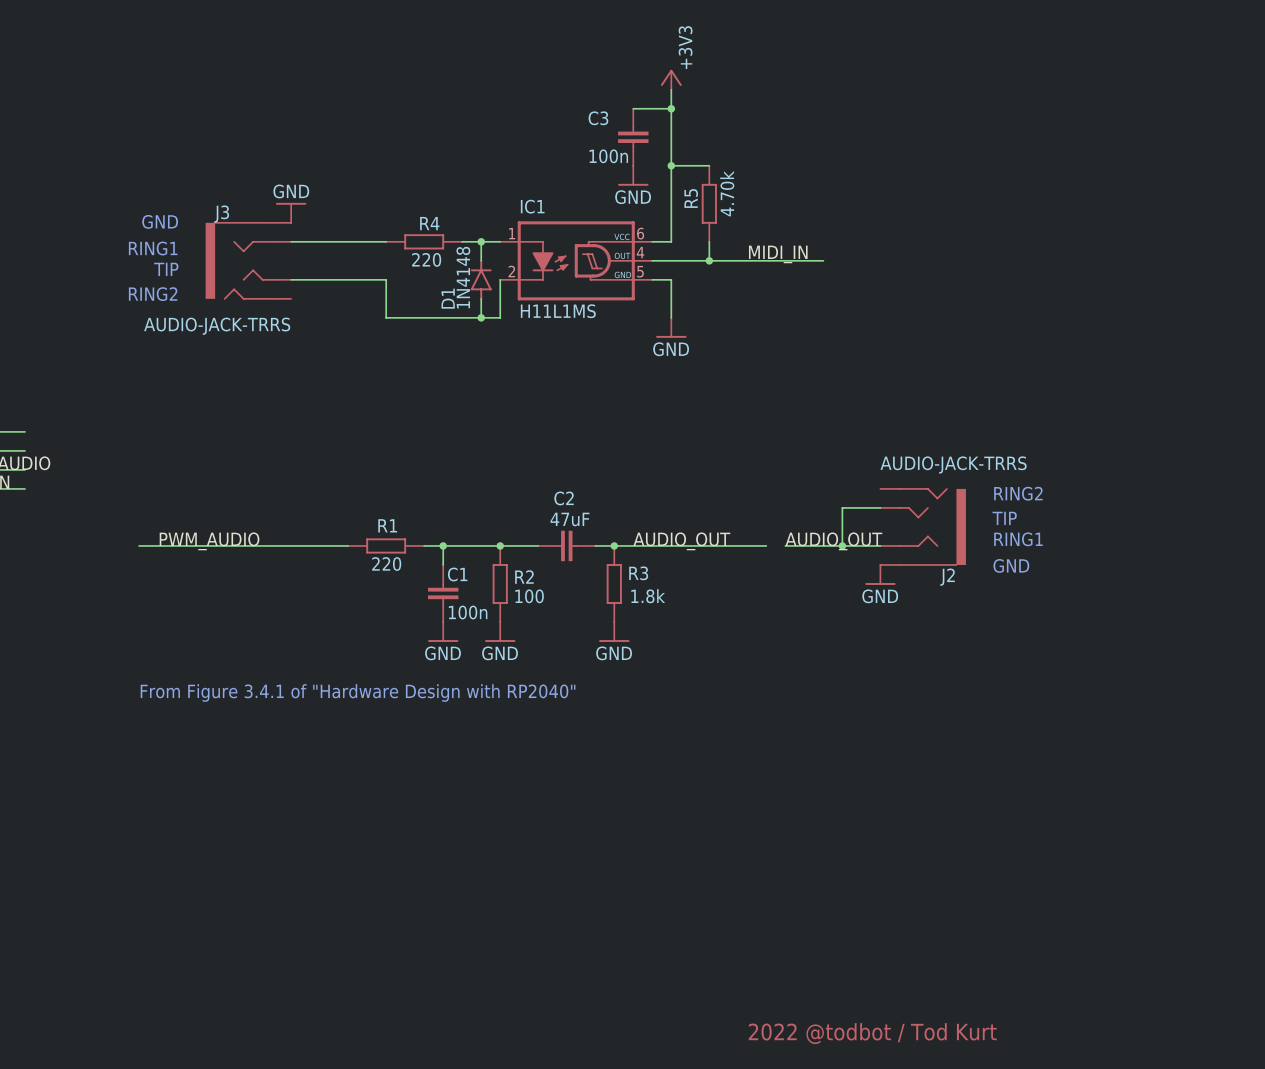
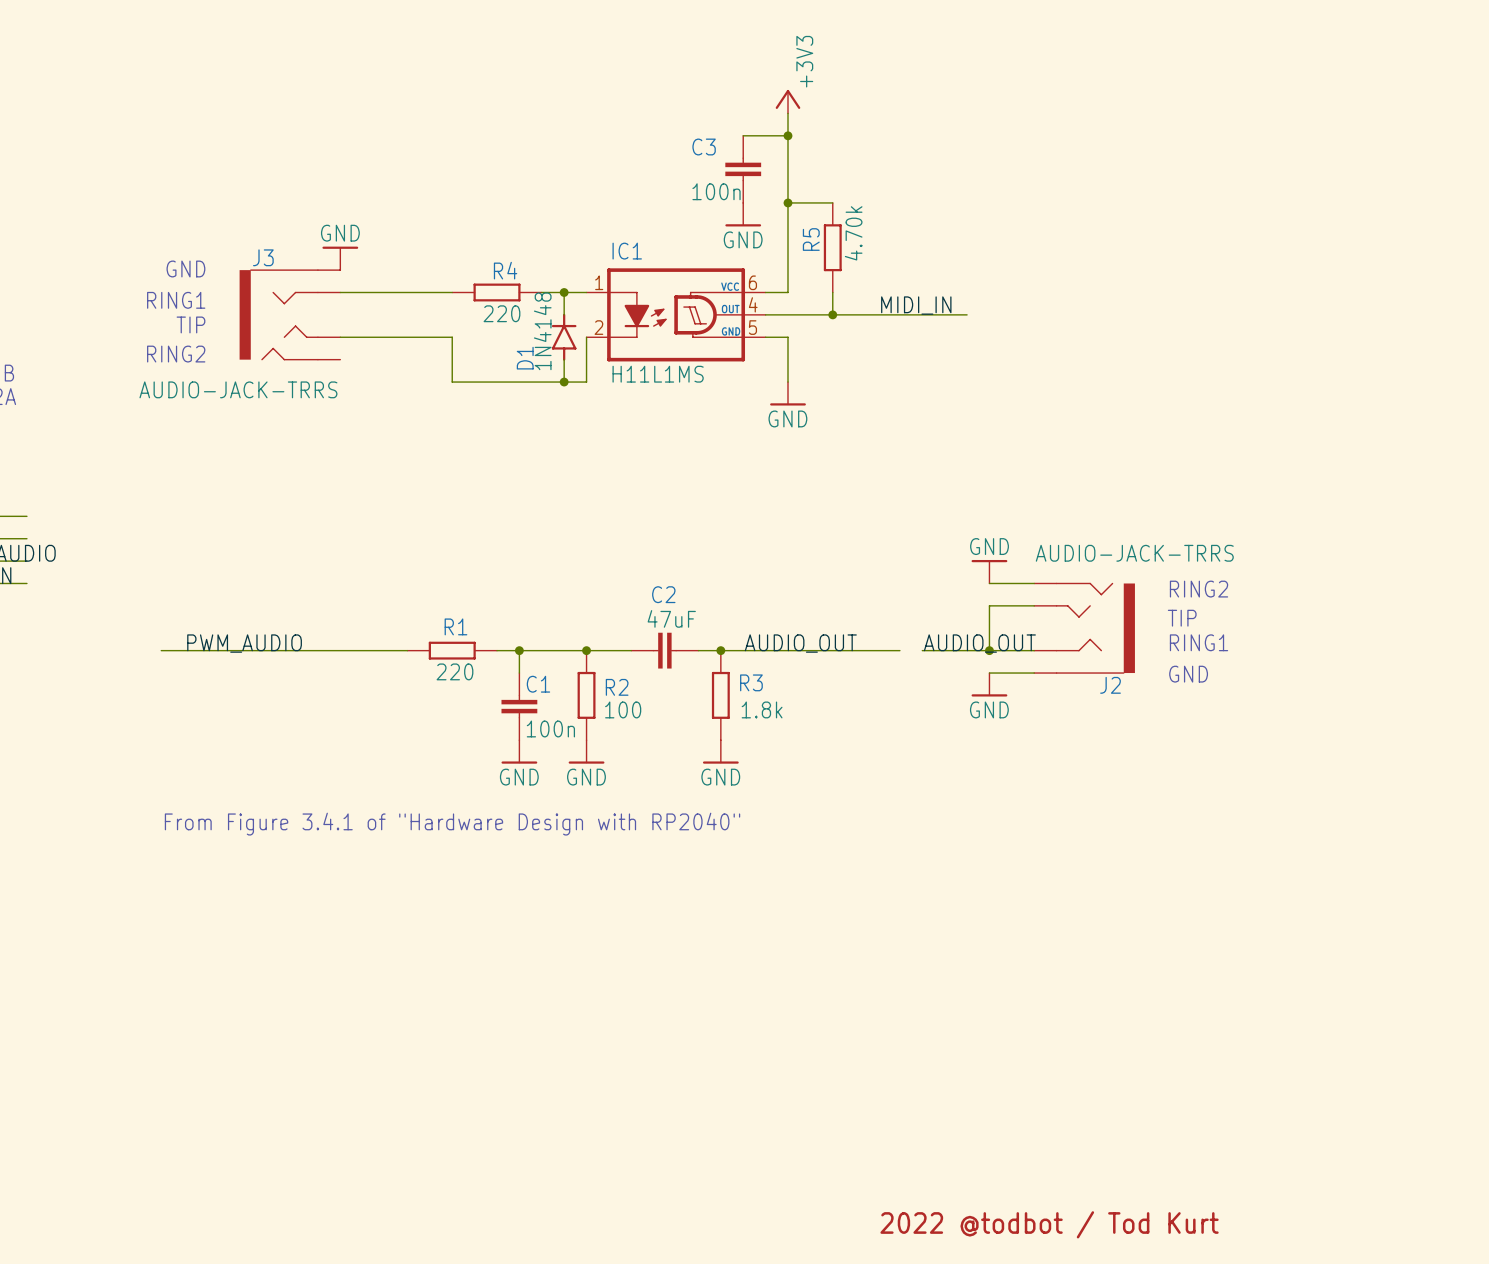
power symbol: none -> GND (989, 571)
wire: none -> (989, 583) (1034, 583)
wire: none -> (989, 673) (1034, 673)
power symbol position: GND (880, 574) -> GND (989, 684)

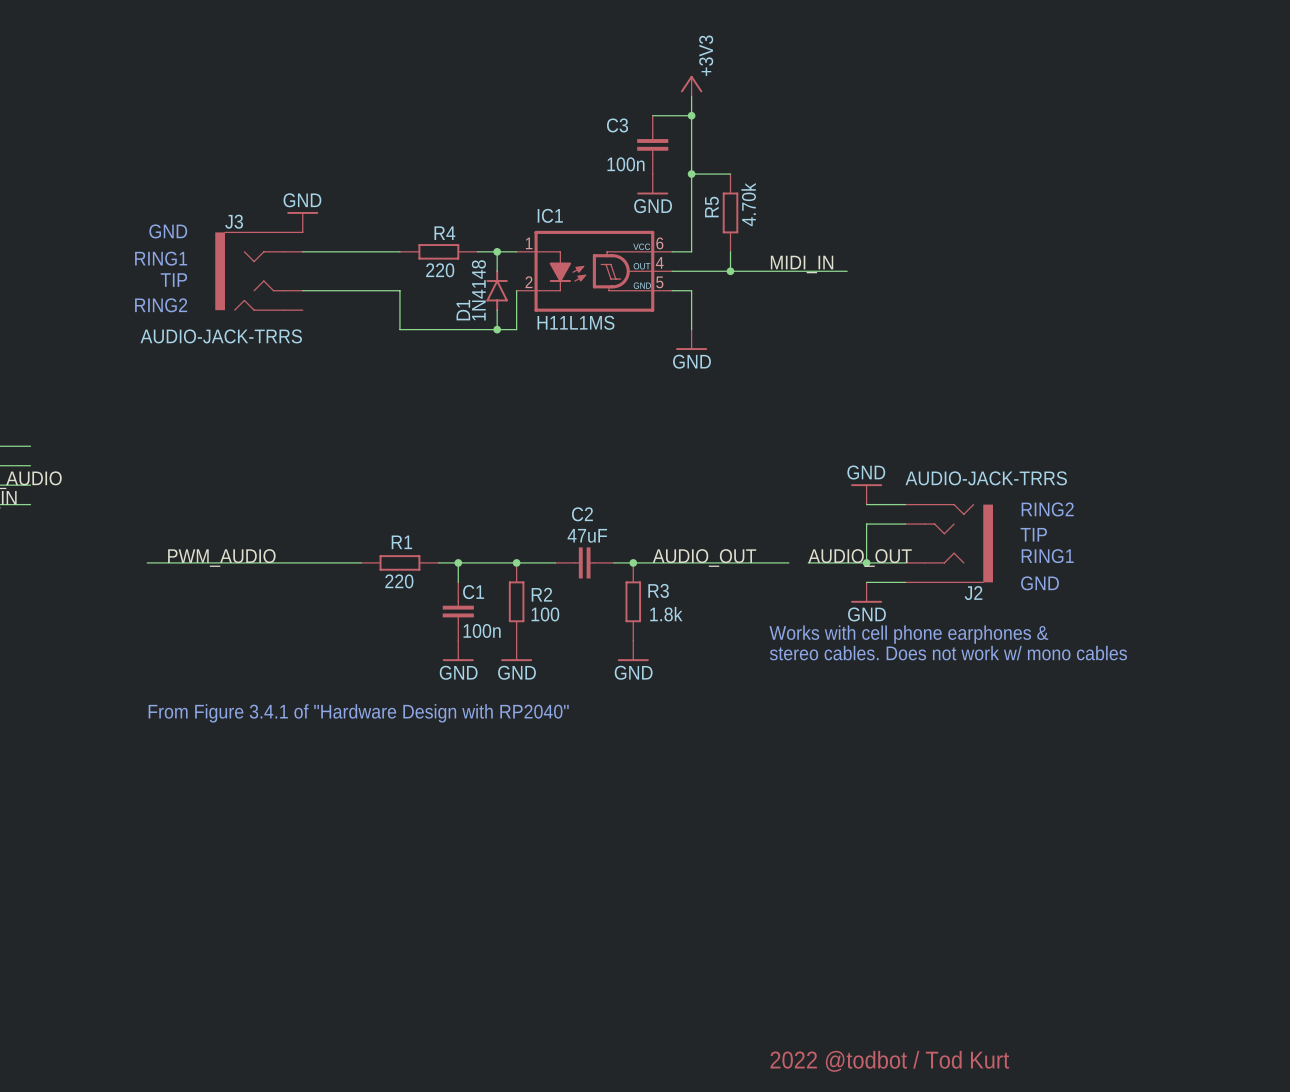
text: none -> Works with cell phone earphones & (908, 634)
text: none -> stereo cables. Does not work w/ mono cables (948, 653)

